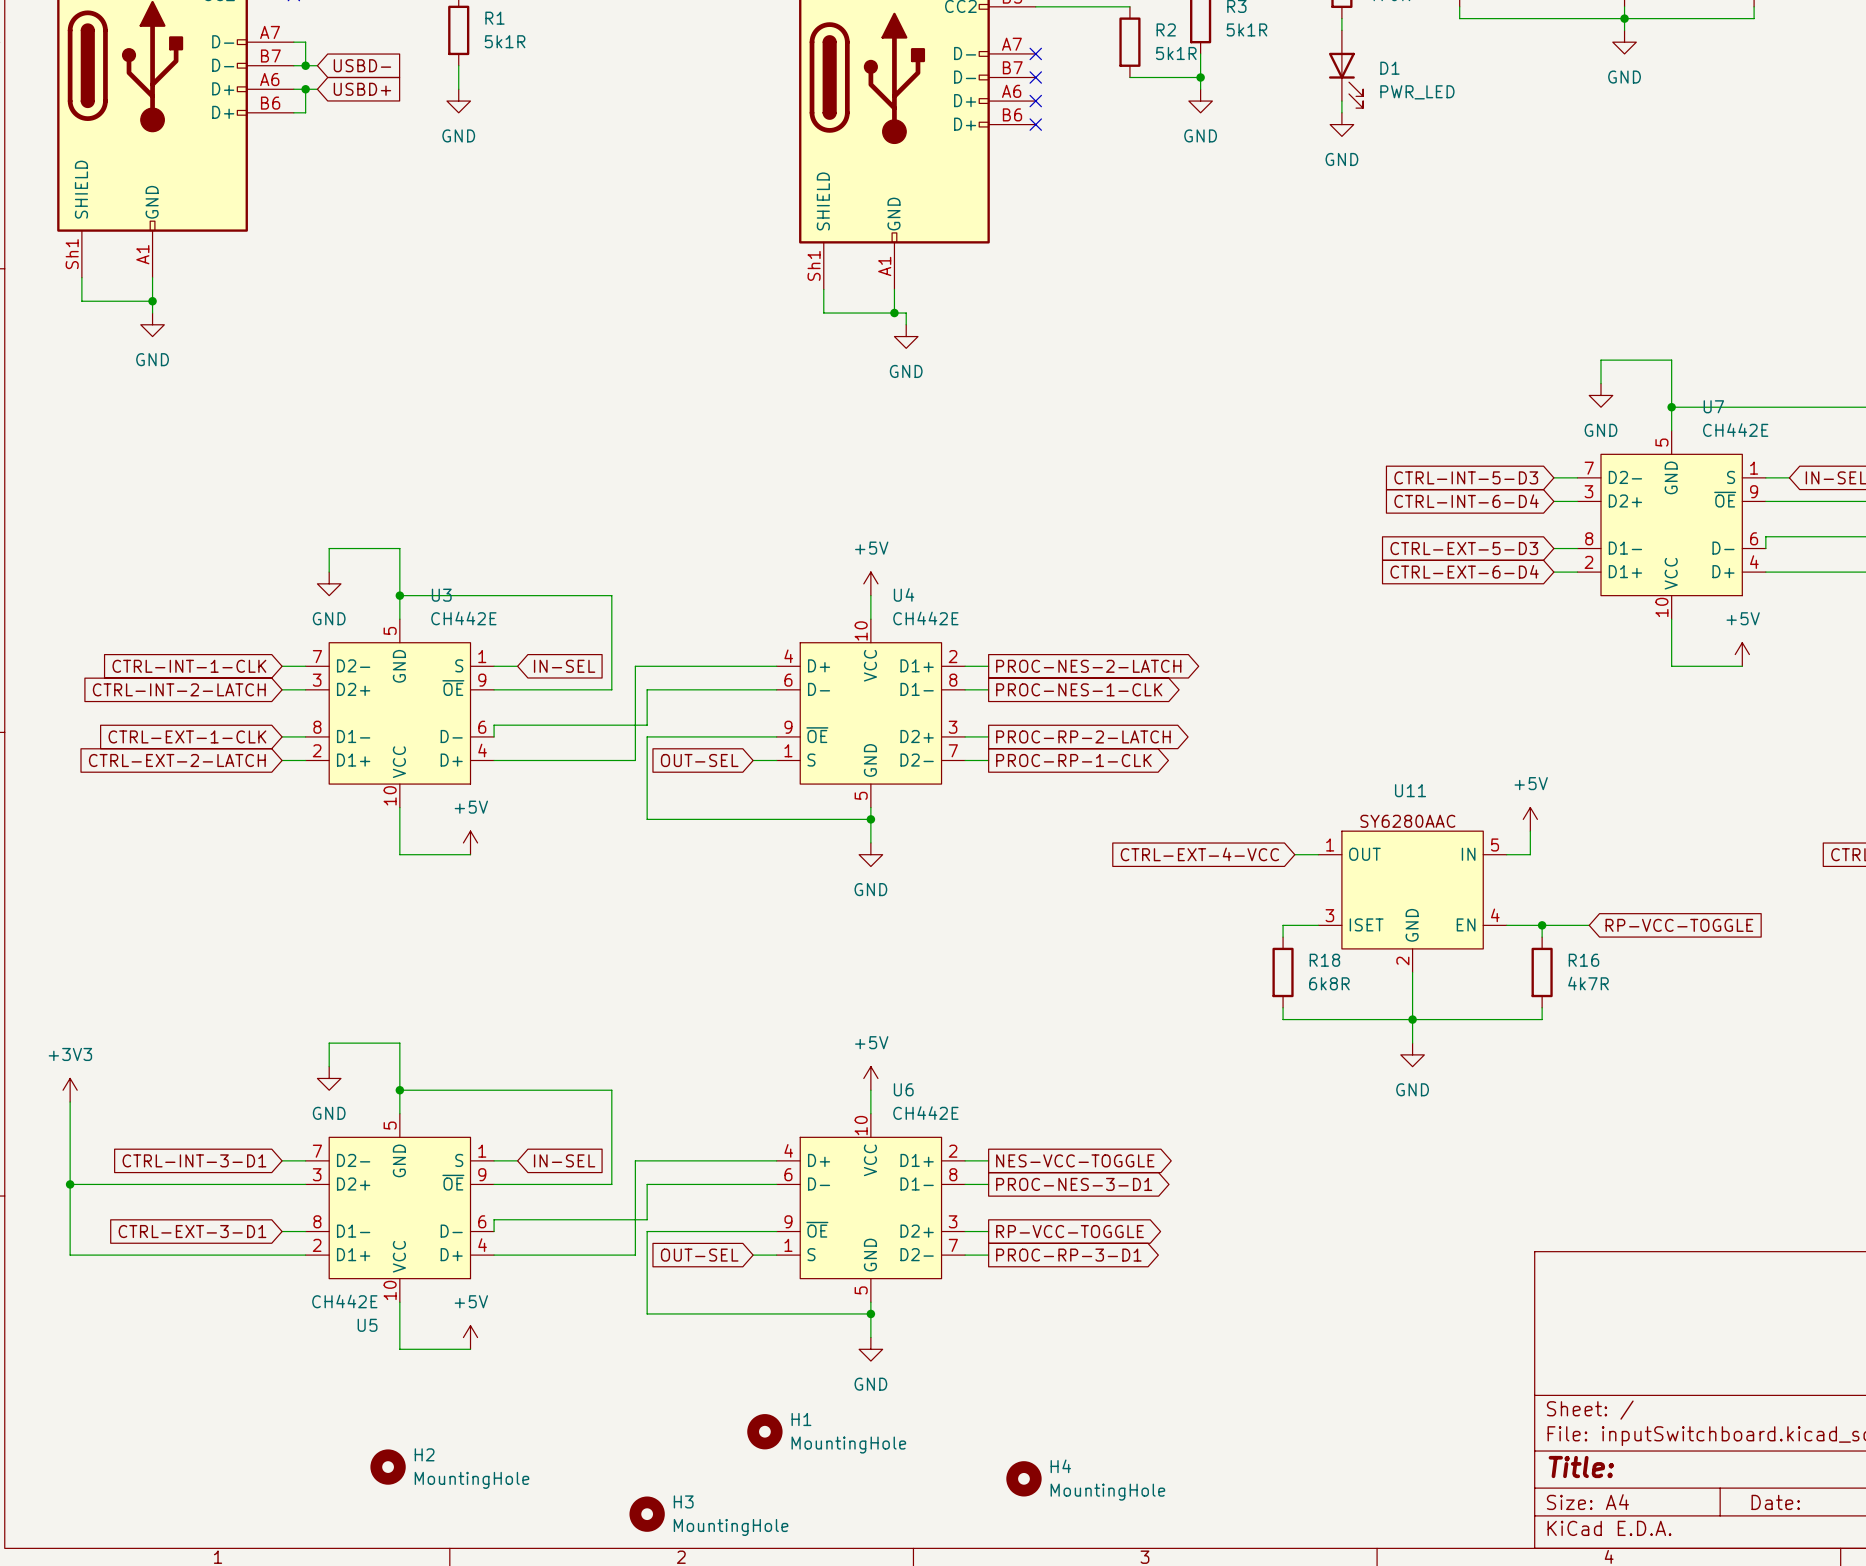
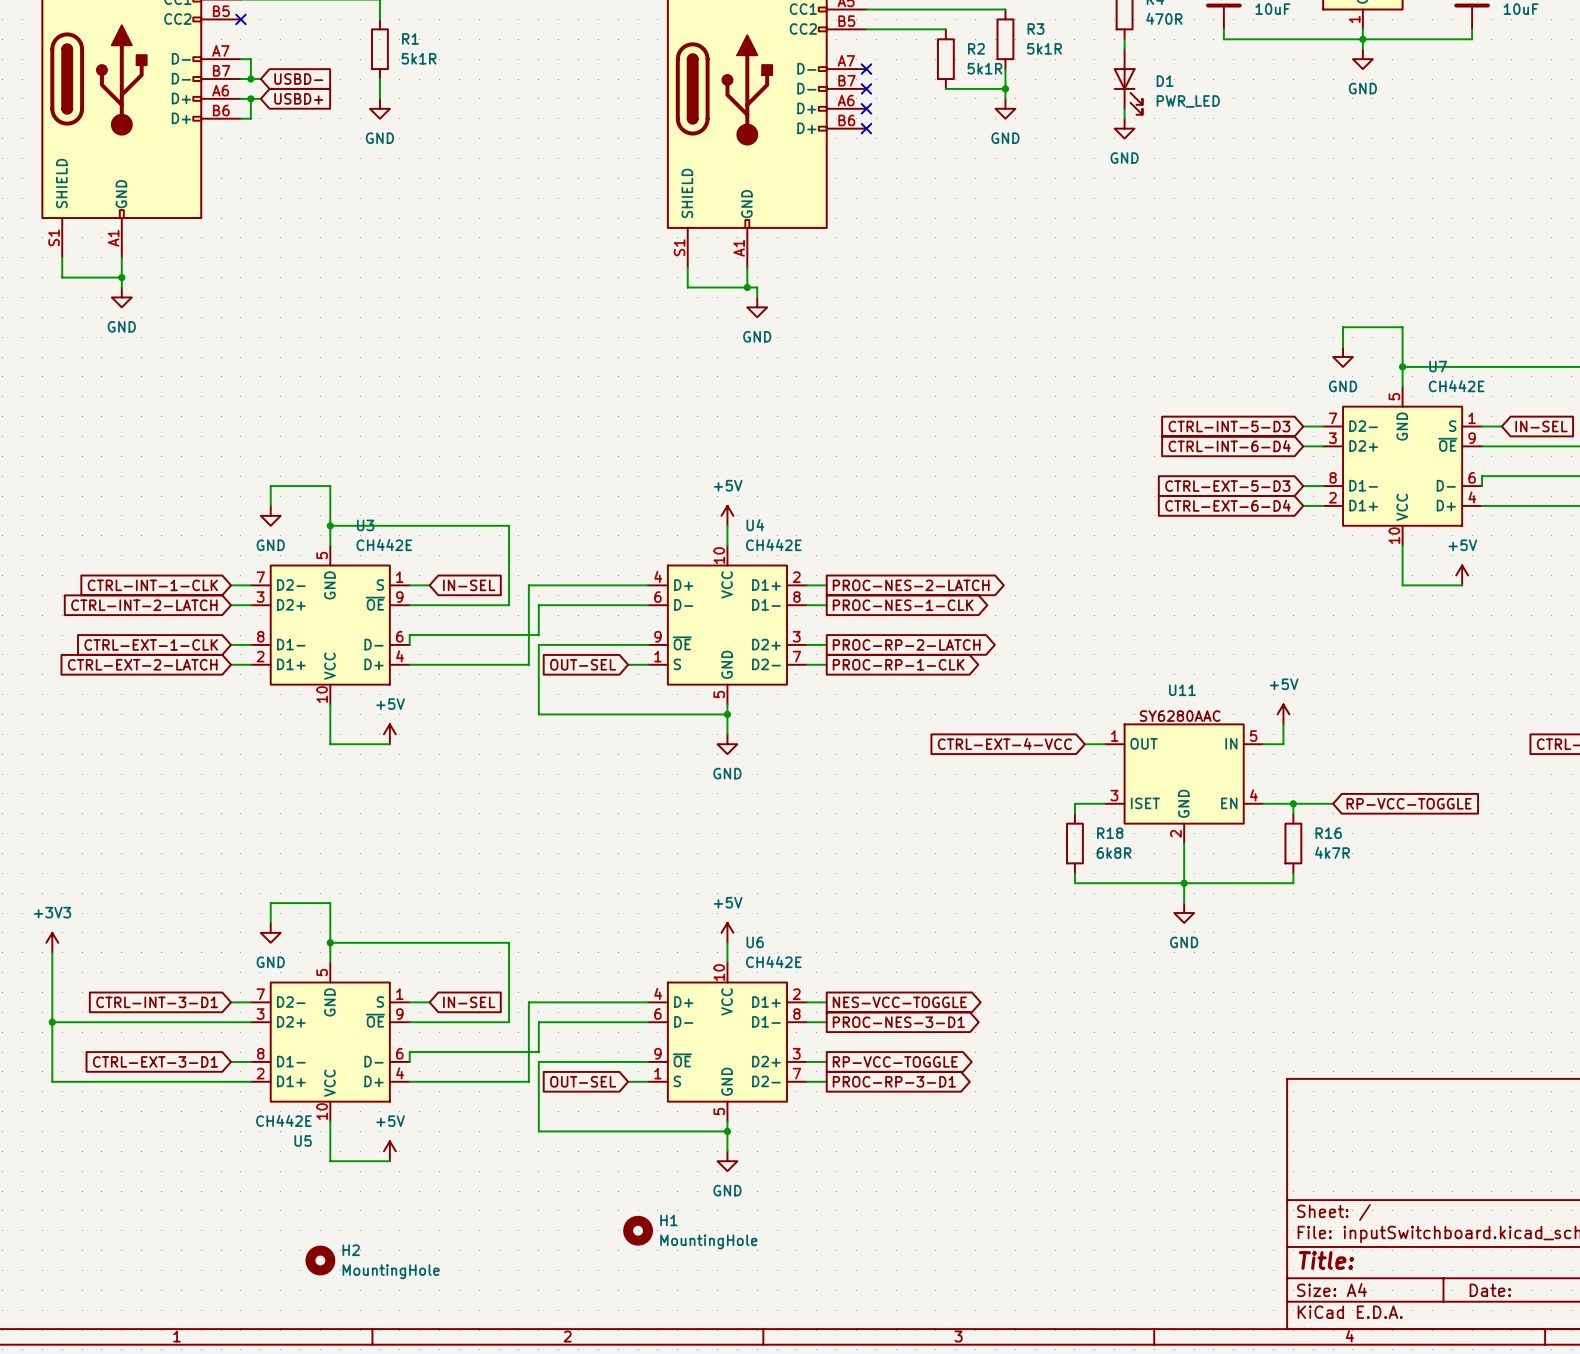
part pin number: Sh1 (72, 254) -> S1 (54, 237)
part pin number: Sh1 (814, 265) -> S1 (679, 247)
H4: MountingHole (1023, 1478) -> none
H3: MountingHole (647, 1514) -> none

